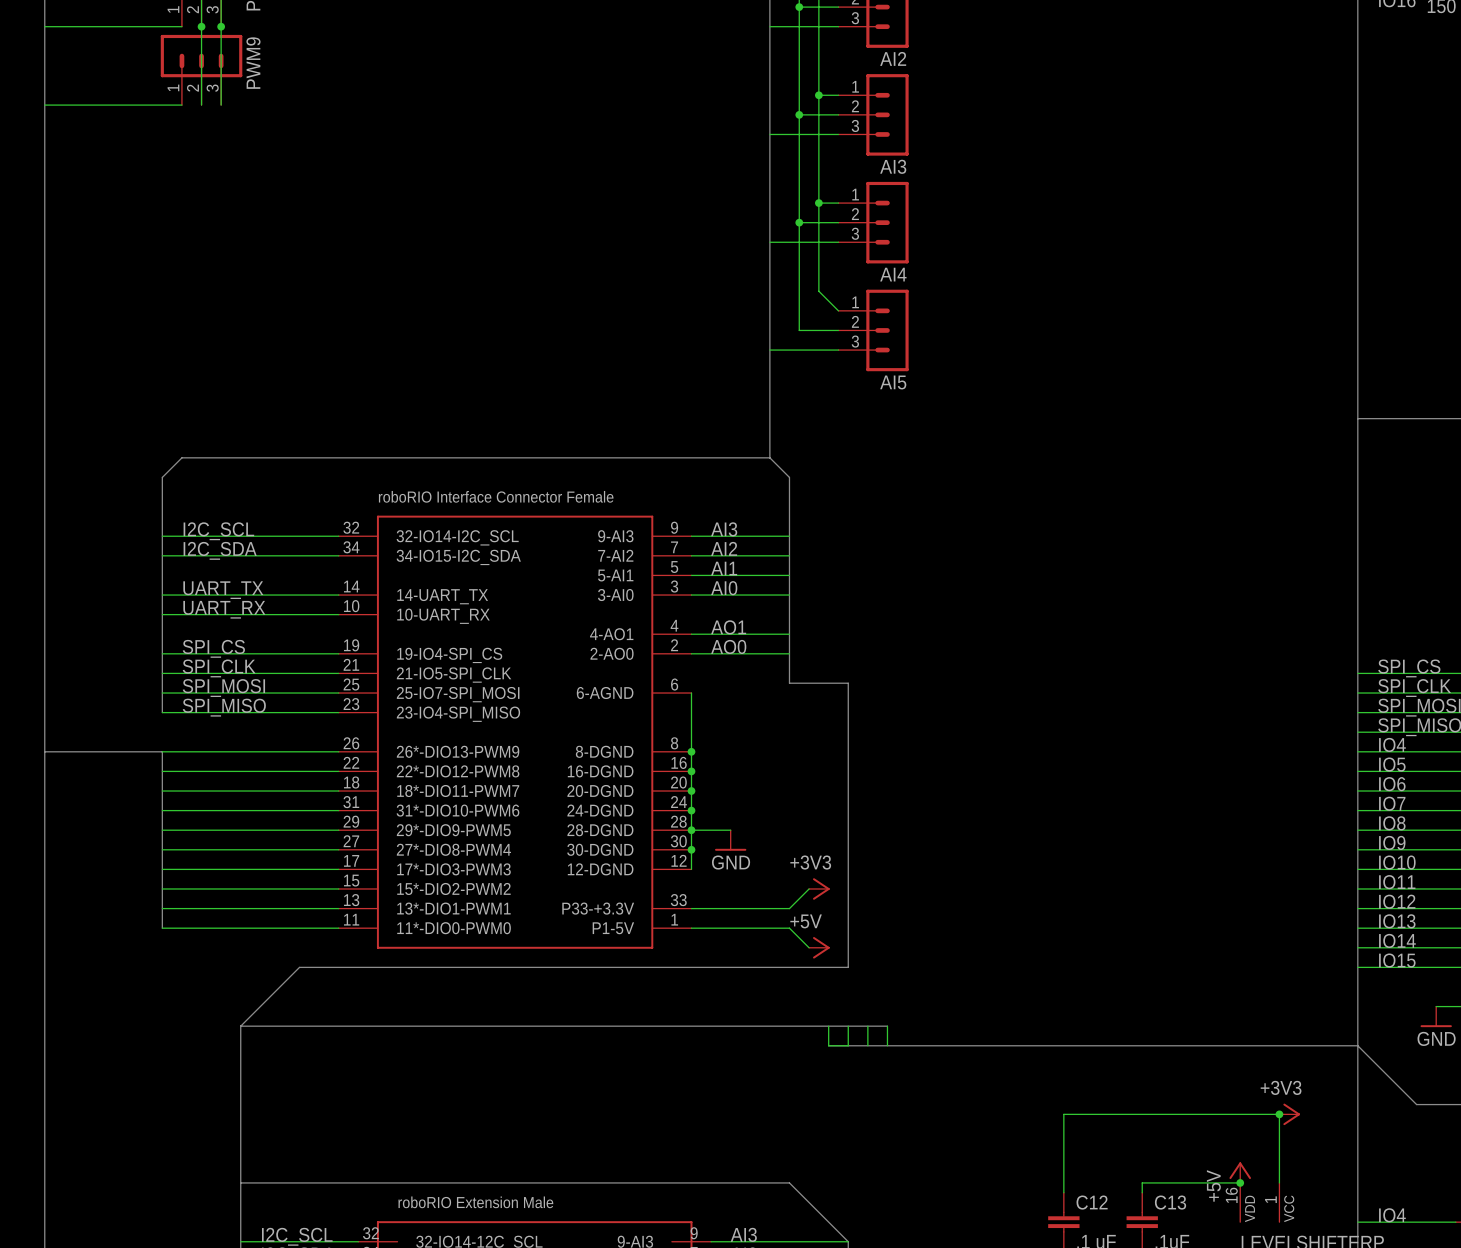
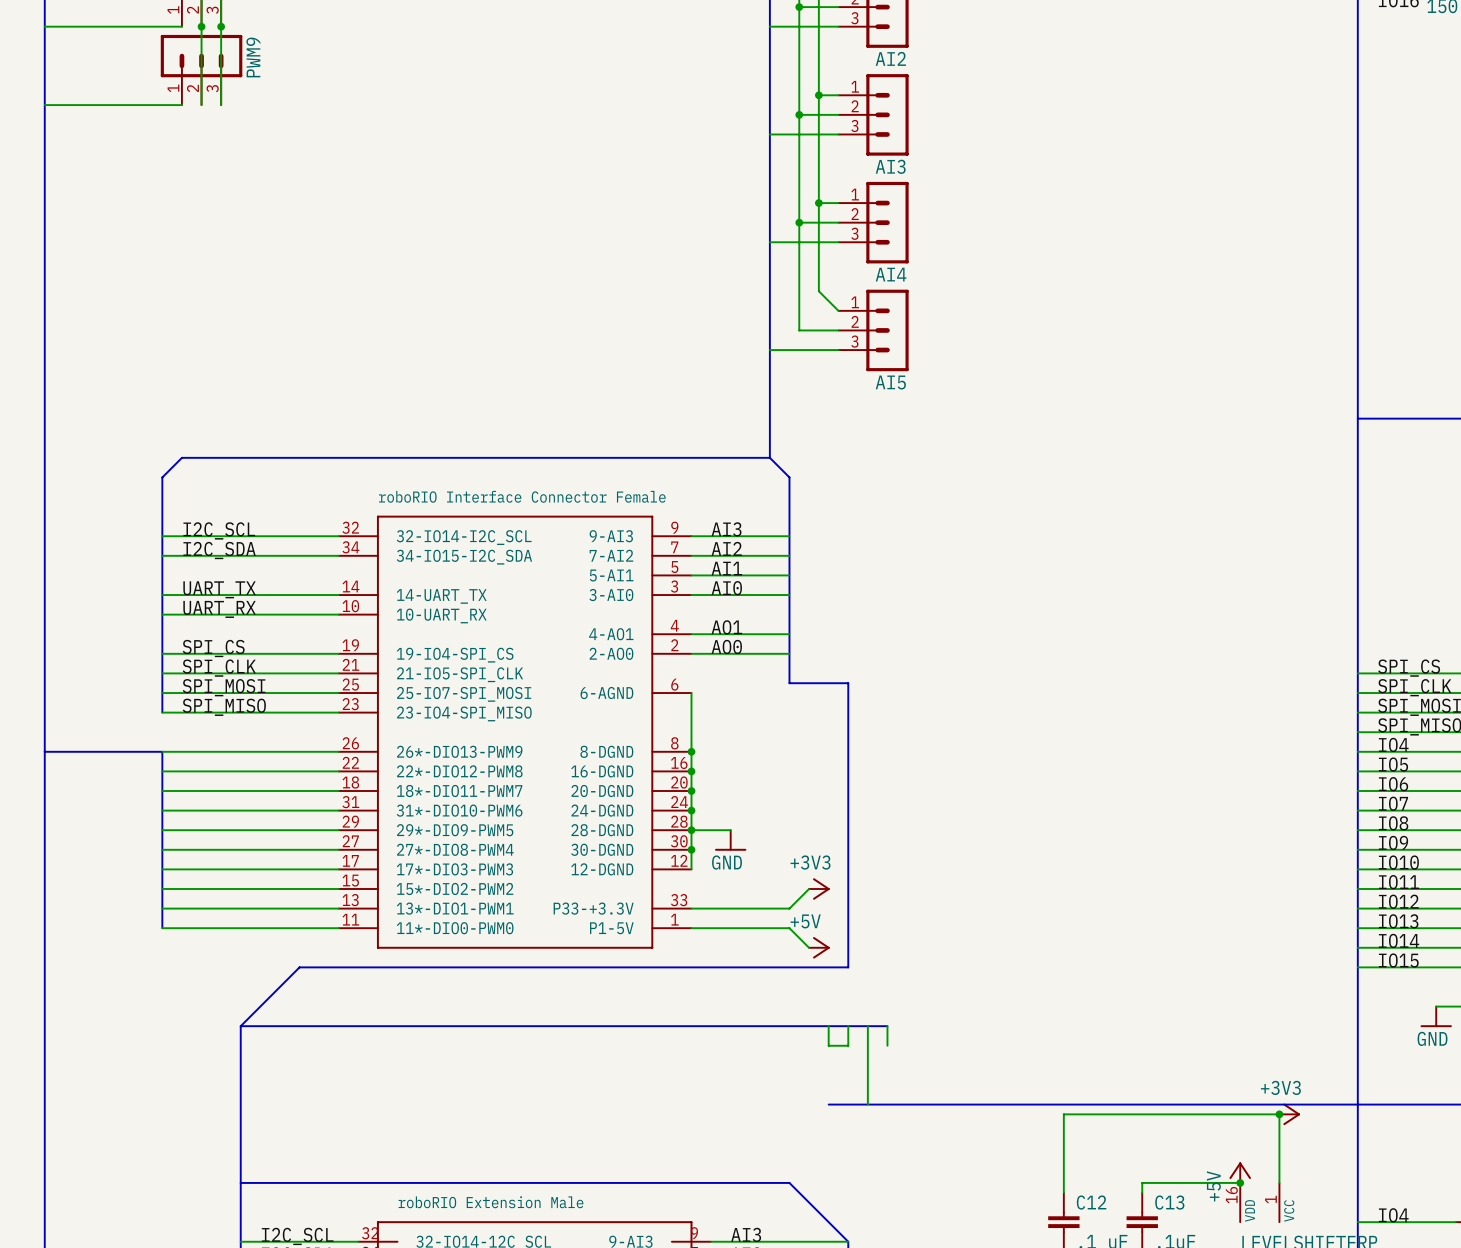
bus: (828, 1045) (1357, 1045) (1416, 1104) -> (828, 1104) (1416, 1104)
wire: none -> (867, 1045) (867, 1104)

